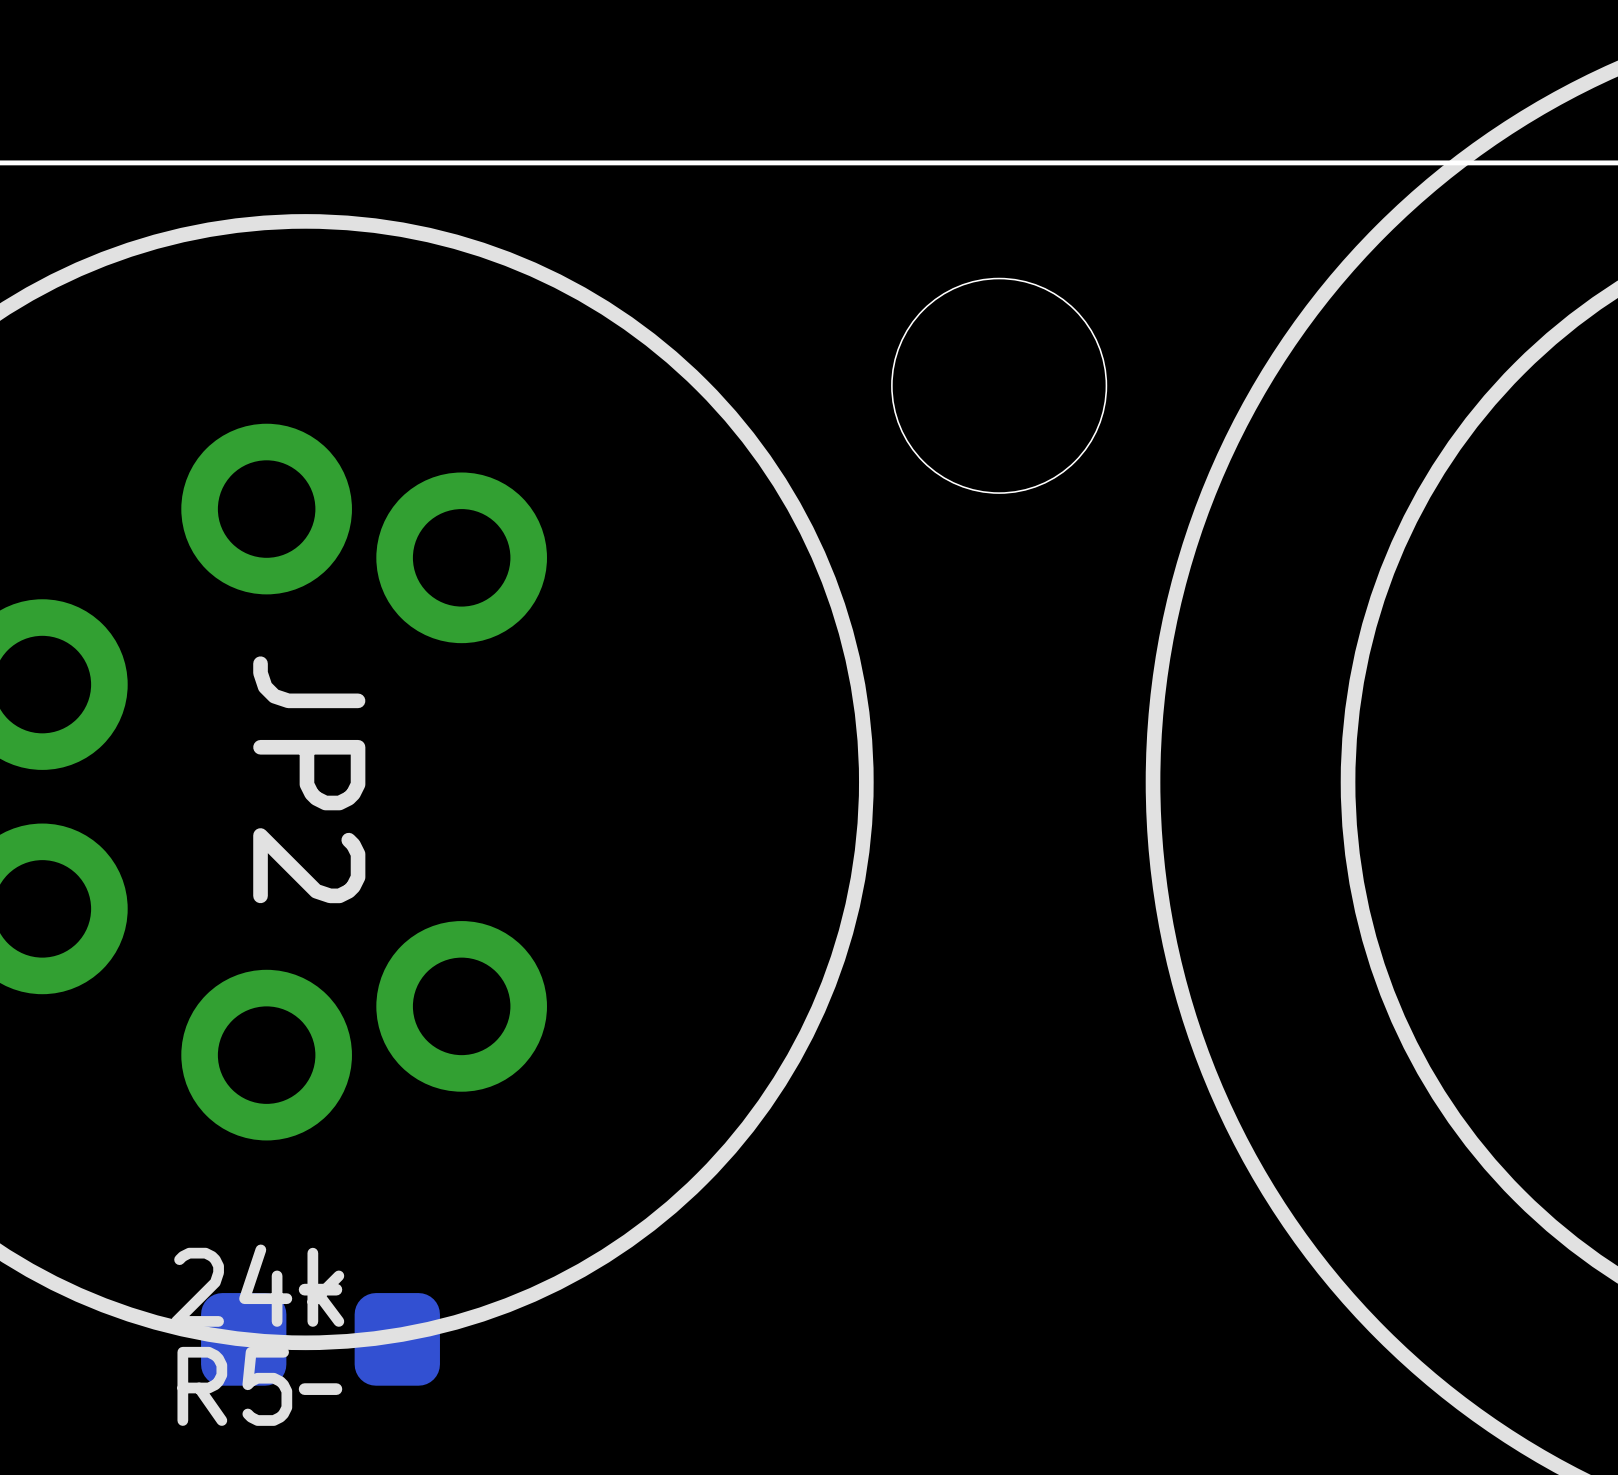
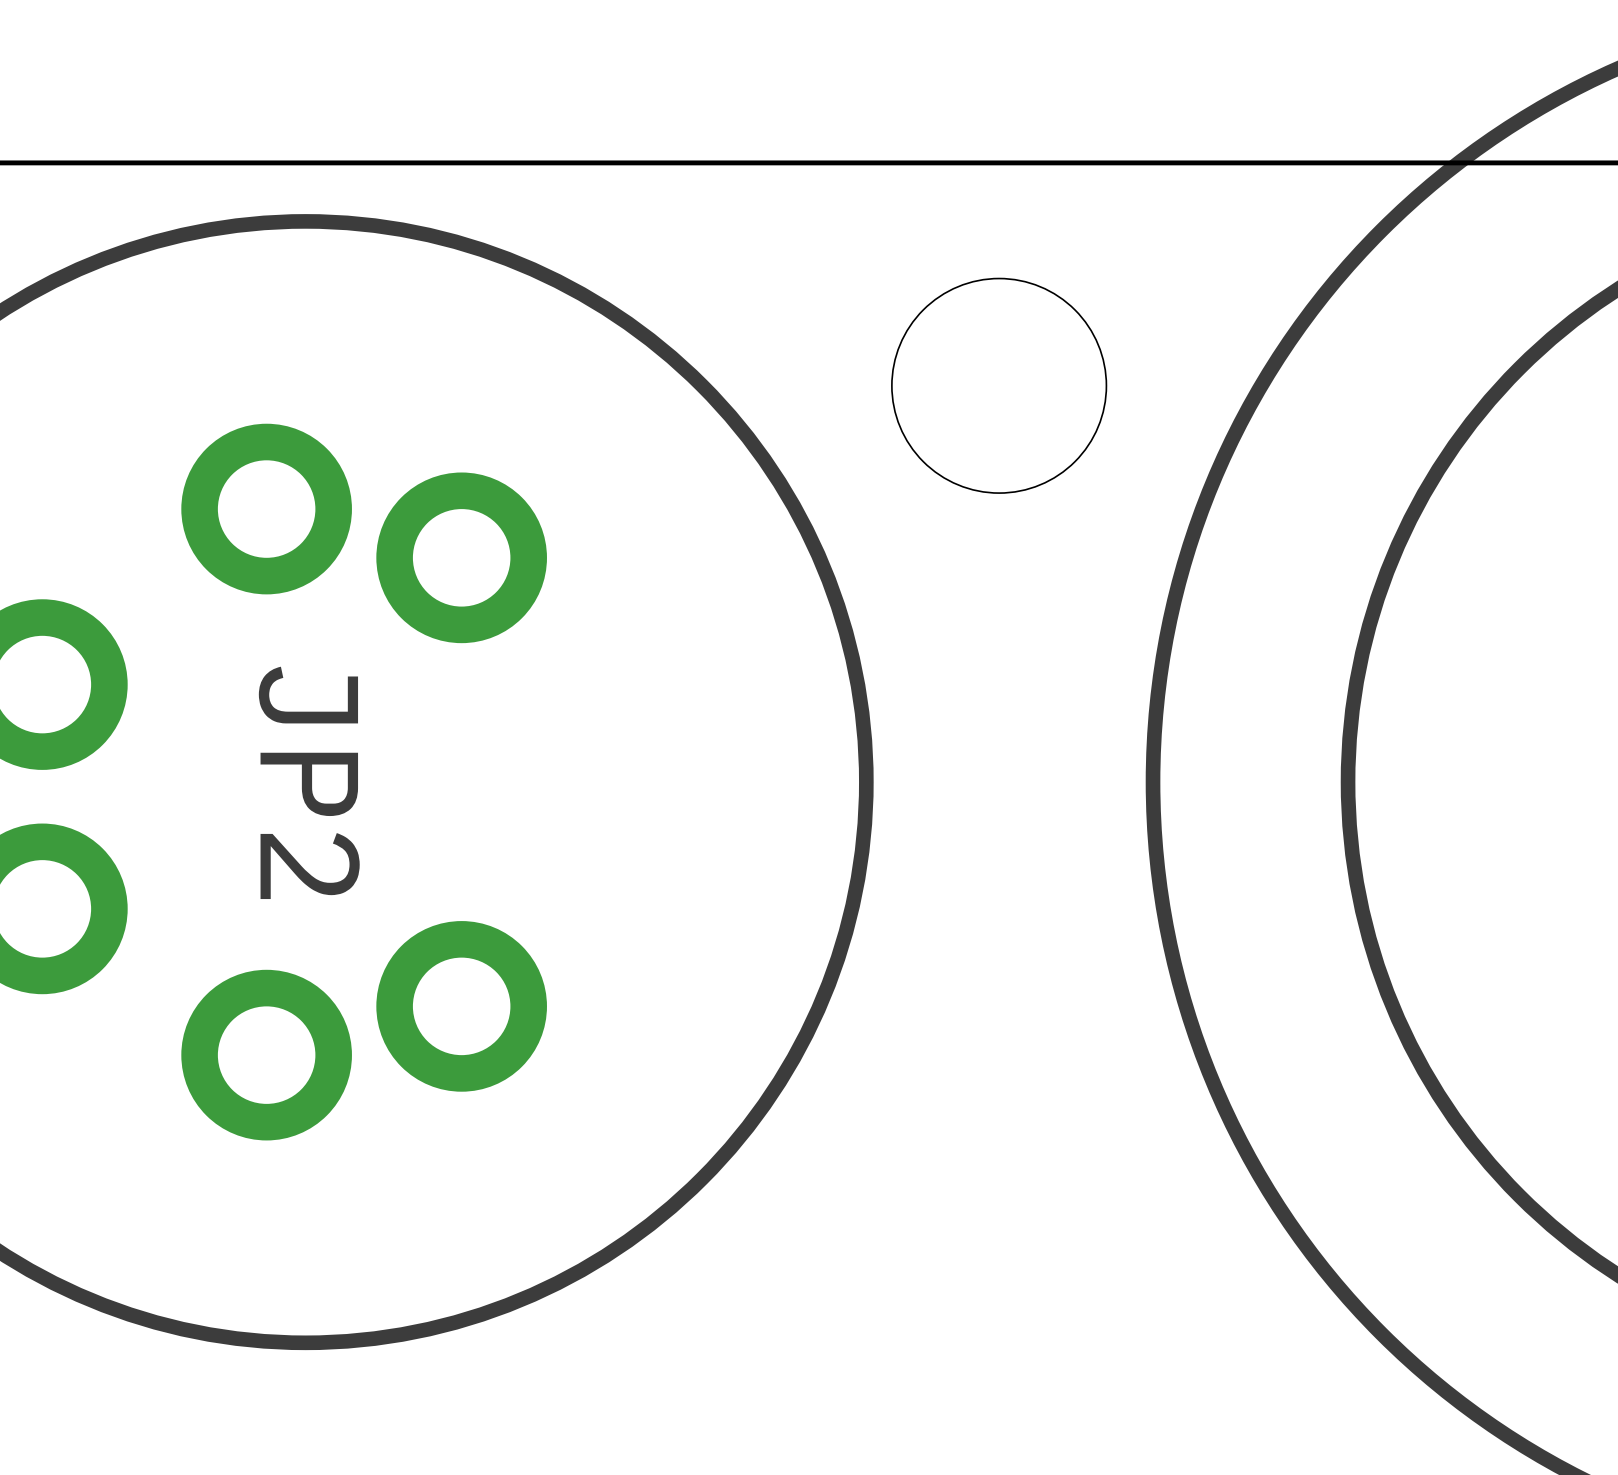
R5: 24k (320, 1339) -> none

